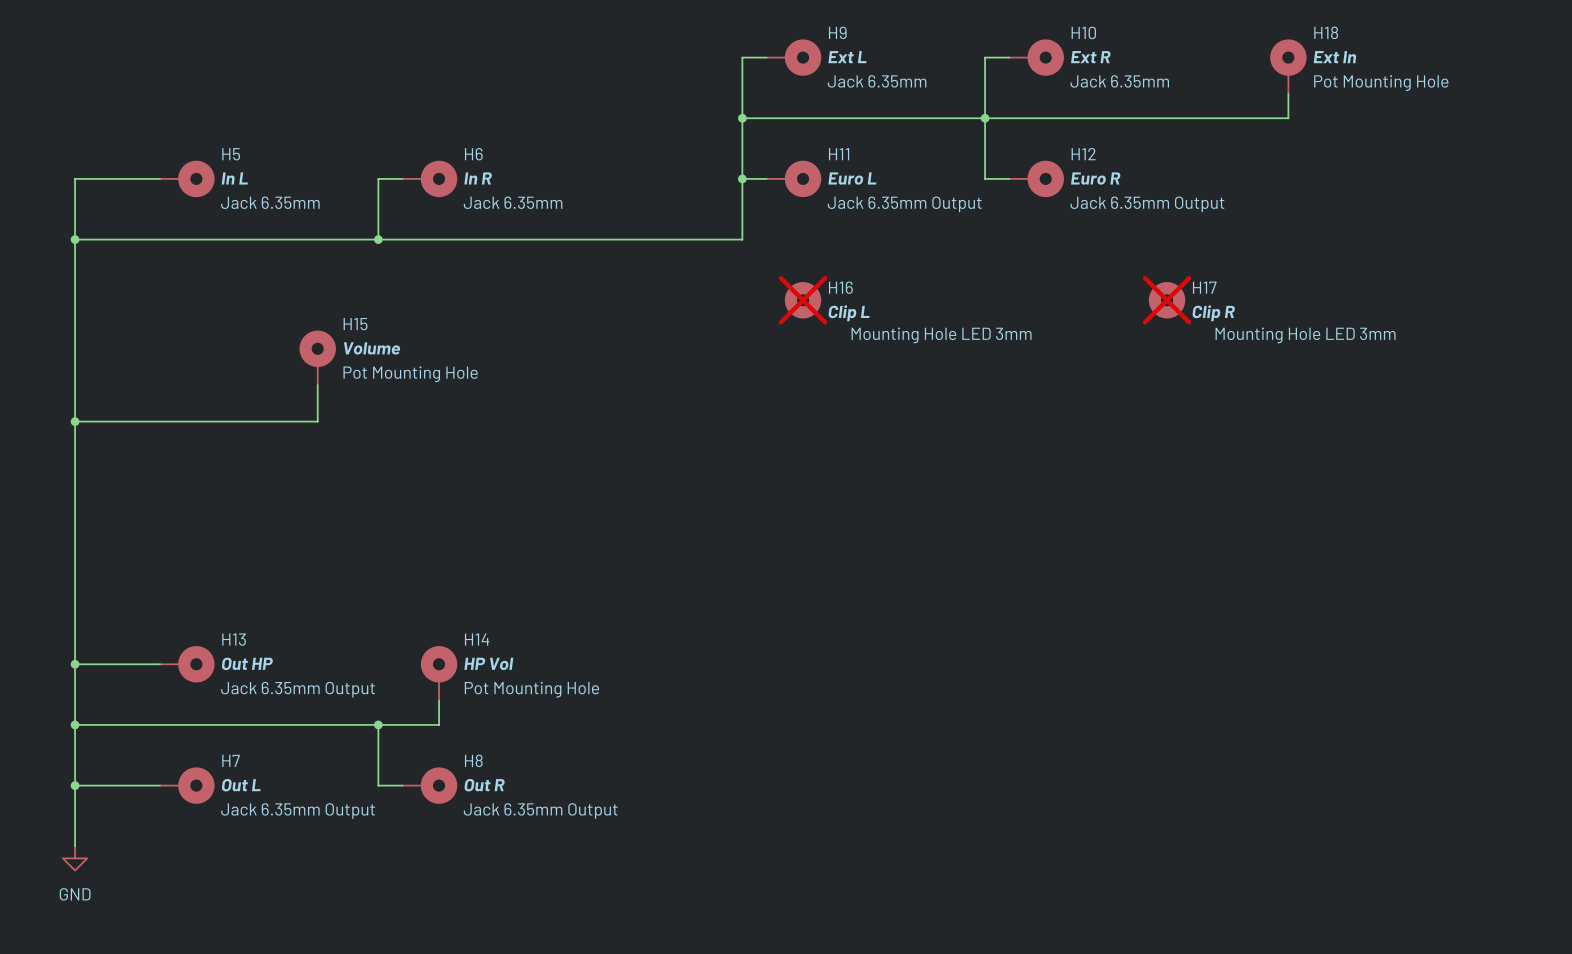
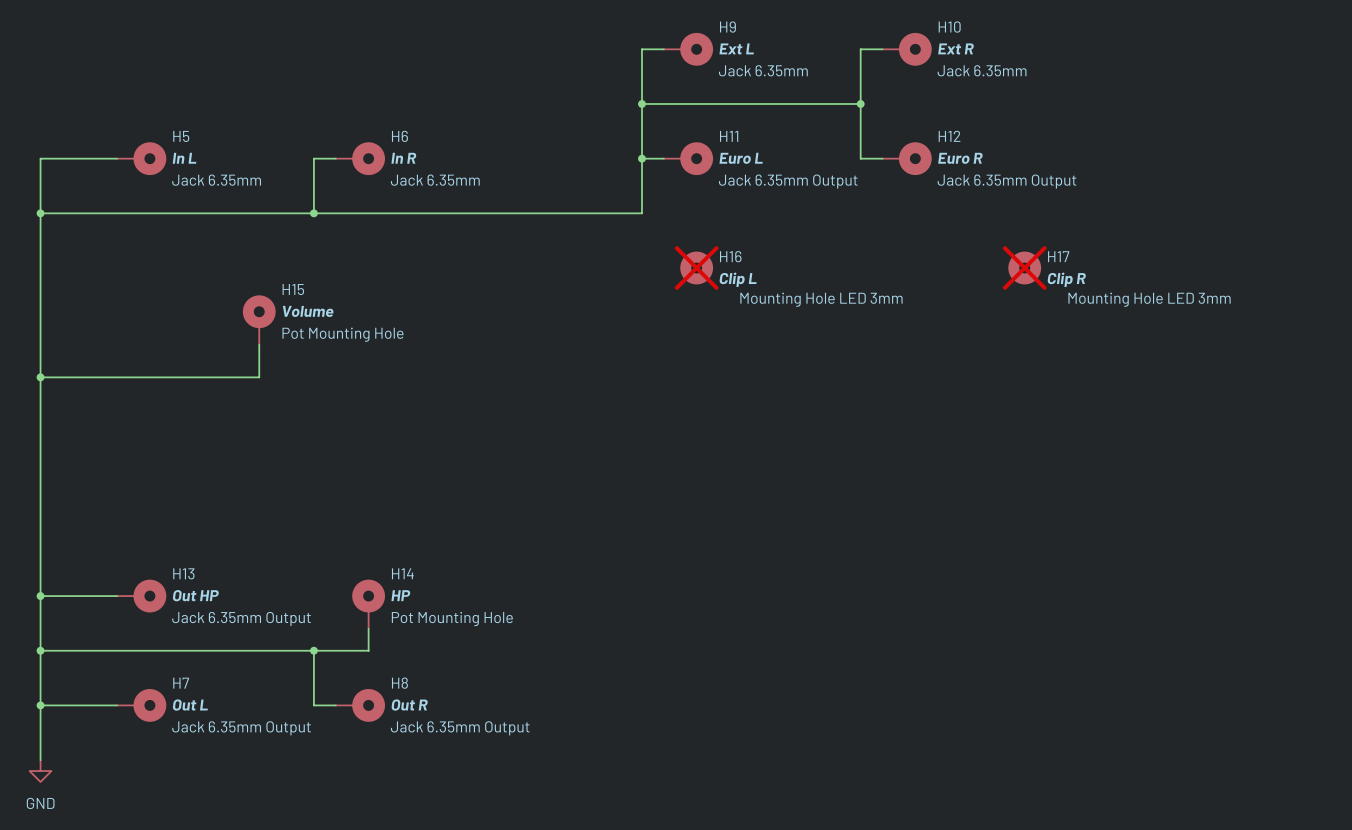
H18: Ext In (1288, 66) -> none
wire: (1288, 93) (1288, 118) (985, 118) -> none
H14 value: HP Vol (488, 663) -> HP (400, 595)

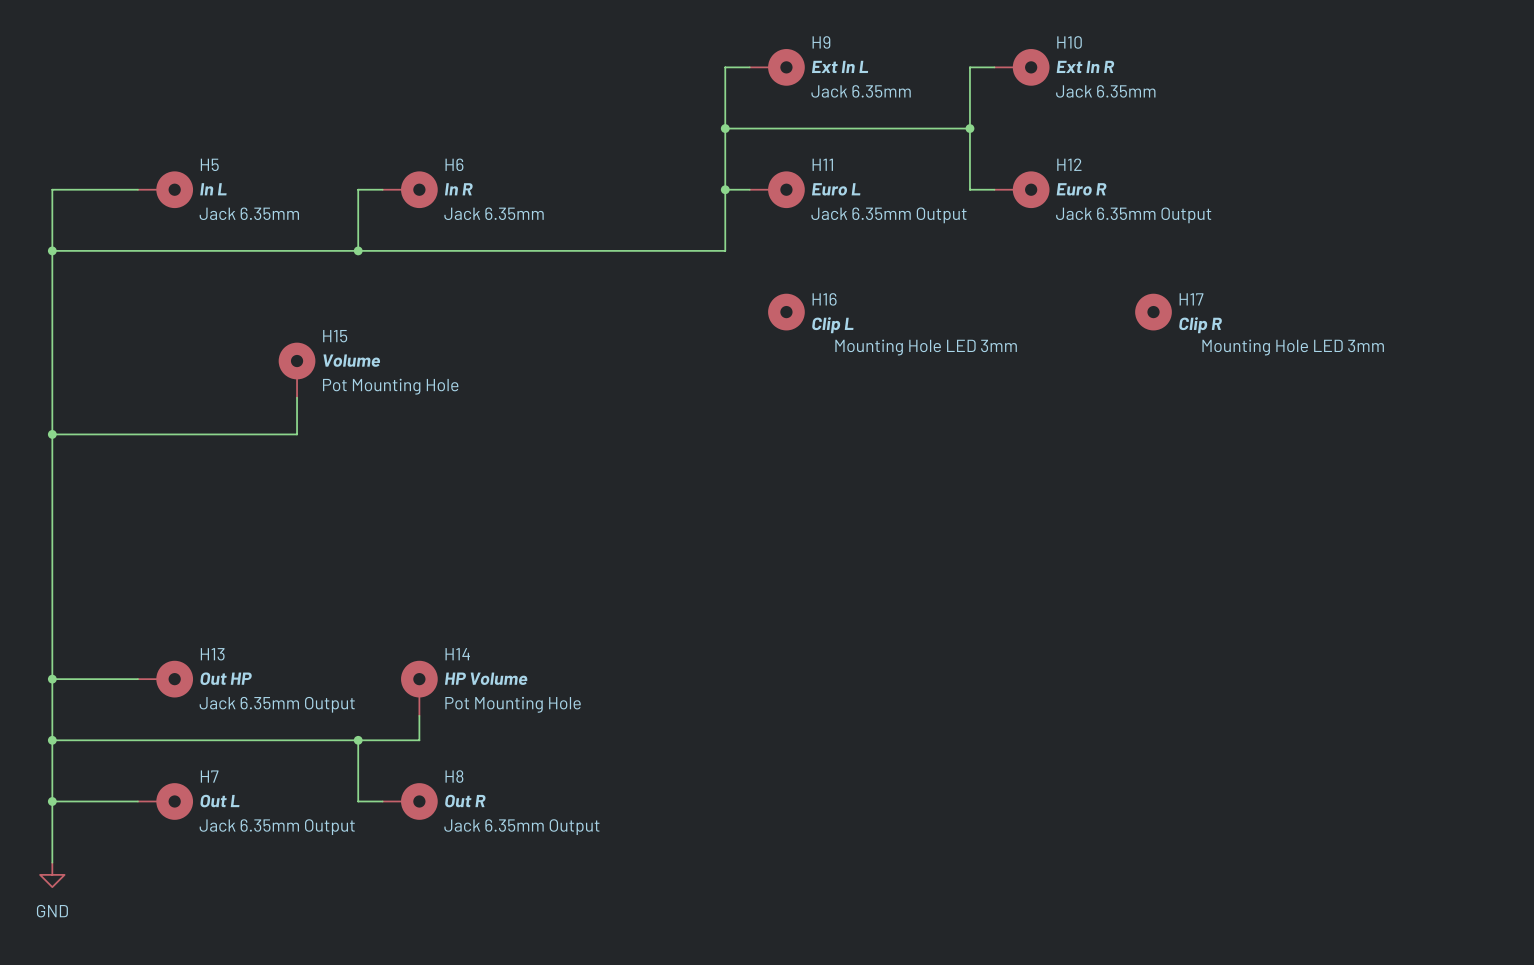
H9 value: Ext L (736, 48) -> Ext In L (840, 66)
H10 value: Ext R (956, 48) -> Ext In R (1085, 66)
H16 do-not-place cross: (696, 268) -> none
H17 do-not-place cross: (1024, 268) -> none
H14 value: HP (400, 595) -> HP Volume (486, 678)

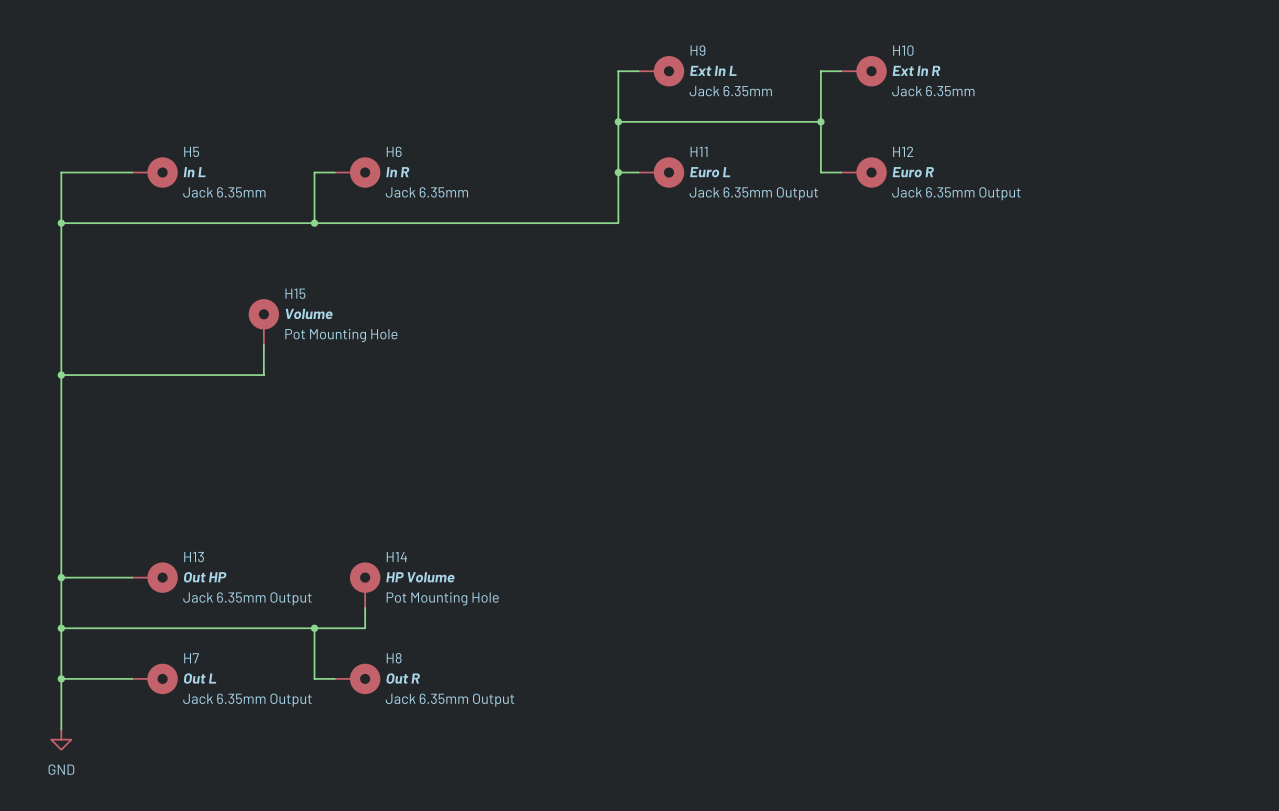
H16: Clip L (786, 312) -> none
H17: Clip R (1153, 312) -> none

